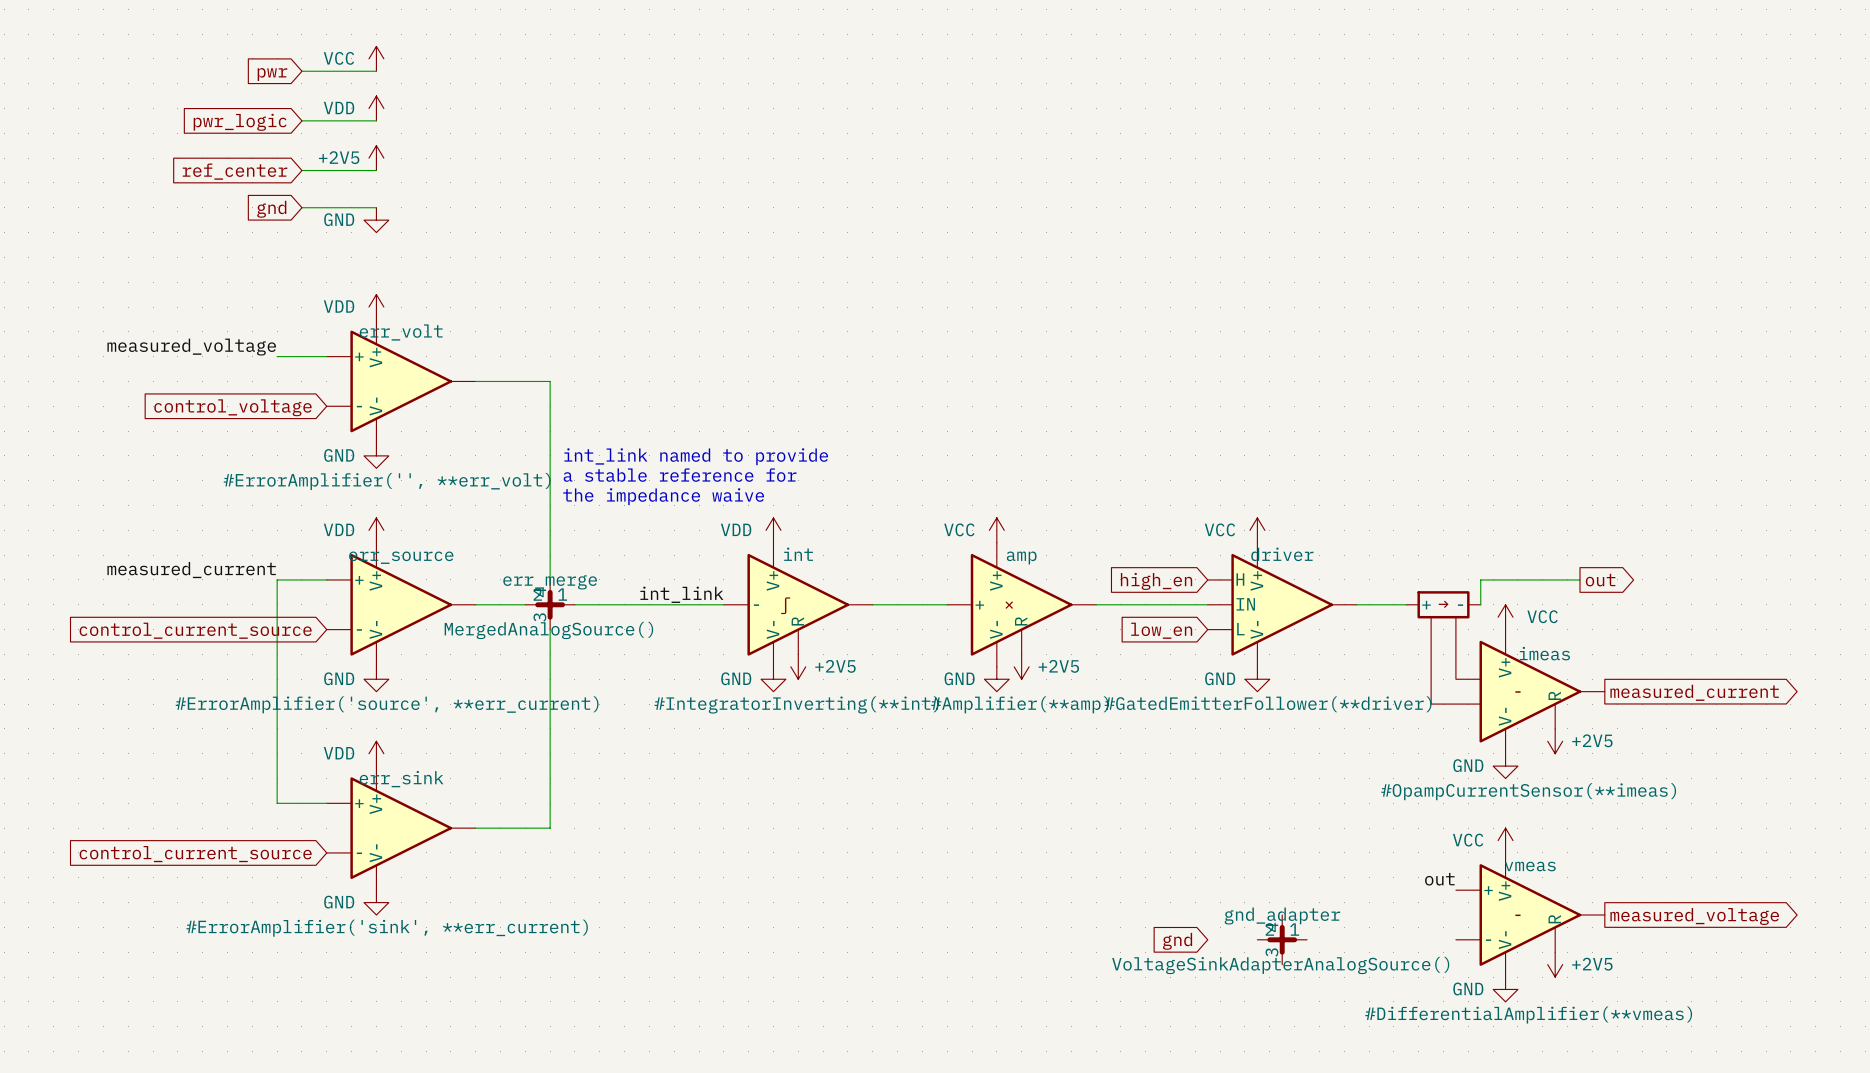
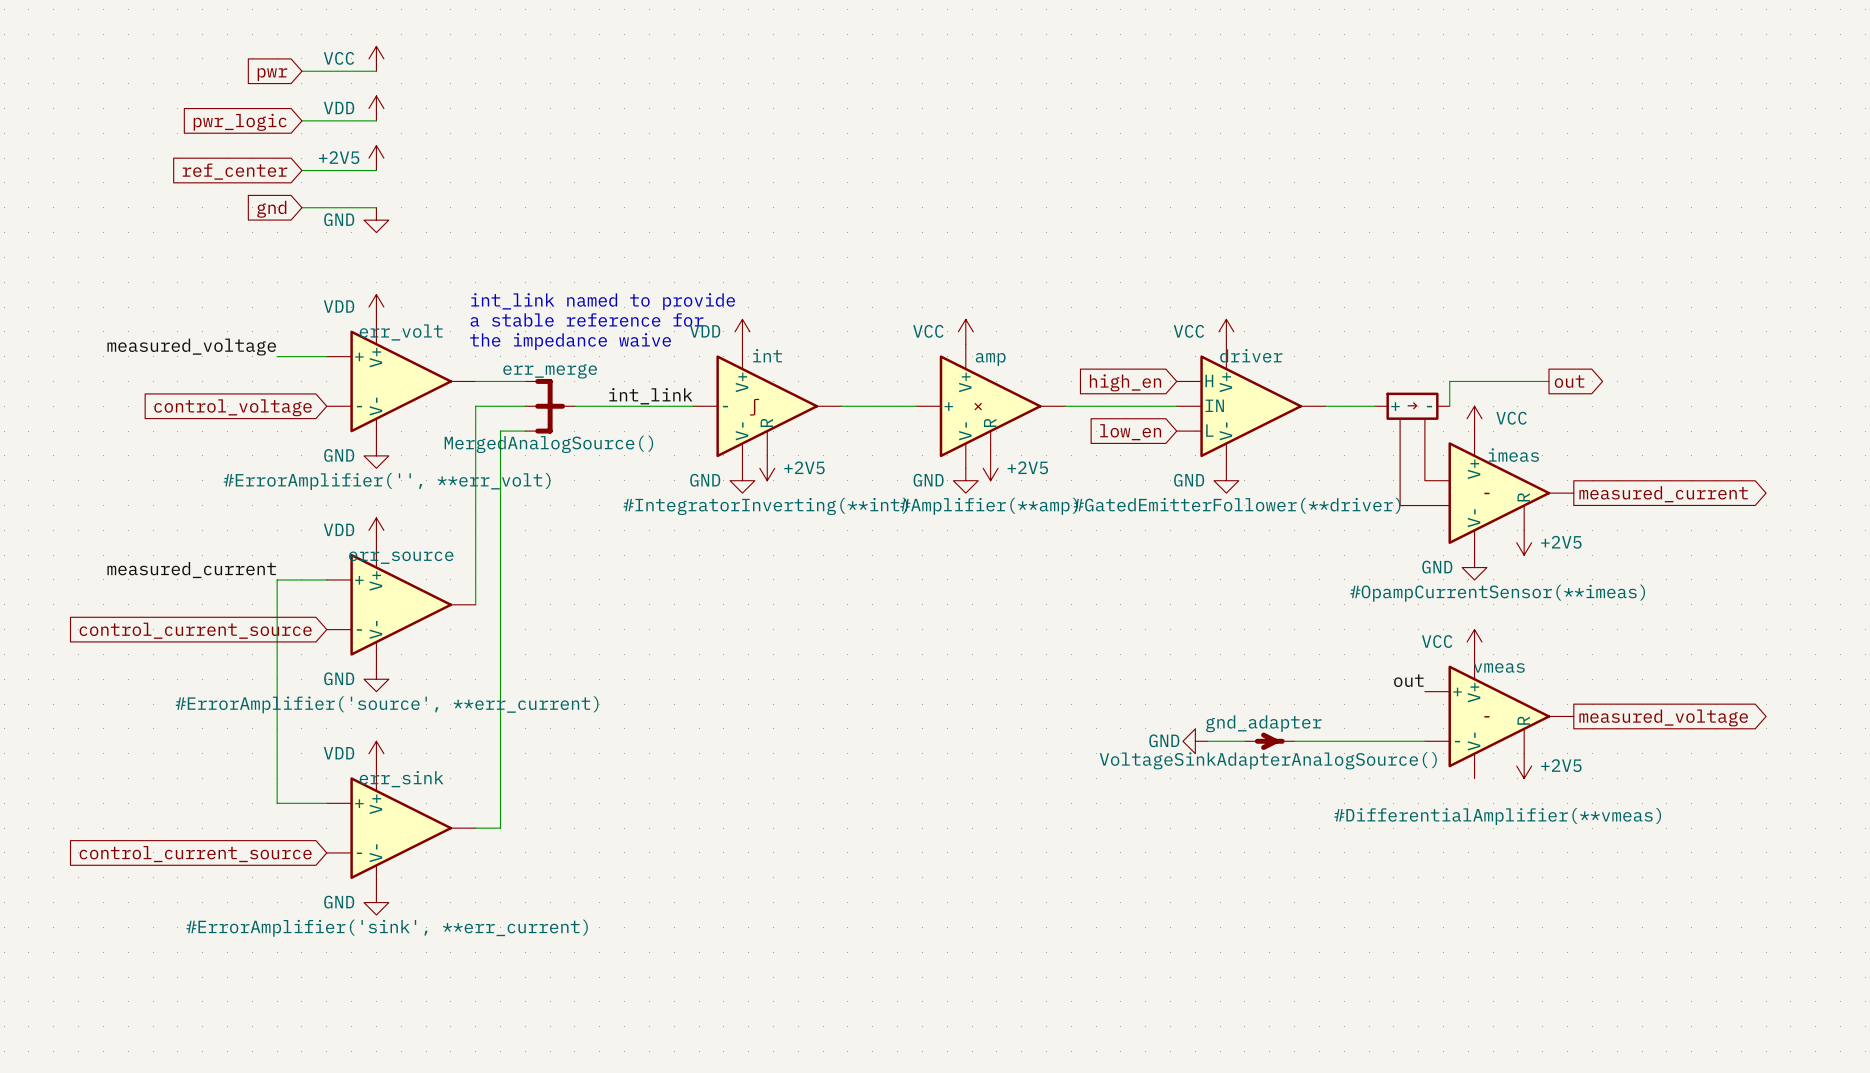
power symbol: none -> VCC (965, 331)
power symbol: none -> VCC (1226, 331)
wire: (525, 381) (550, 381) (550, 579) -> none
err_merge: none -> MergedAnalogSource() (550, 406)
wire: none -> (574, 406) (692, 406)
power symbol: none -> VCC (1474, 418)
text position: int_link named to provide (696, 456) -> int_link named to provide (603, 301)
power symbol: none -> +2V5 (767, 468)
power symbol: none -> +2V5 (990, 468)
text position: a stable reference for (680, 475) -> a stable reference for (587, 320)
power symbol: none -> GND (742, 480)
power symbol: none -> GND (965, 480)
power symbol: none -> GND (1226, 480)
text position: the impedance waive (663, 496) -> the impedance waive (570, 341)
power symbol position: VDD (773, 530) -> VDD (742, 331)
power symbol: VCC (996, 530) -> none
power symbol: VCC (1257, 530) -> none
power symbol: none -> +2V5 (1524, 542)
power symbol: none -> GND (1474, 567)
wire: (1580, 579) (1480, 579) (1480, 604) -> (1548, 381) (1449, 381) (1449, 406)
global label position: out (1600, 580) -> out (1569, 381)
global label position: high_en (1156, 581) -> high_en (1125, 382)
label position: int_link (681, 594) -> int_link (650, 396)
wire: (475, 604) (525, 604) -> (475, 604) (475, 406) (525, 406)
err_merge: MergedAnalogSource() (550, 604) -> none
wire: (574, 604) (723, 604) -> none
int position: (798, 604) -> (767, 406)
wire: (872, 604) (947, 604) -> (841, 406) (916, 406)
amp position: (1021, 604) -> (990, 406)
wire: (1096, 604) (1207, 604) -> (1065, 406) (1176, 406)
driver position: (1282, 604) -> (1251, 406)
wire: (1356, 604) (1406, 604) -> (1325, 406) (1375, 406)
power symbol text position: VCC (1542, 616) -> VCC (1437, 641)
power symbol position: VCC (1505, 617) -> VCC (1474, 642)
wire: (550, 629) (550, 828) (500, 828) -> (525, 431) (500, 431) (500, 828)
global label position: low_en (1161, 630) -> low_en (1130, 432)
power symbol: +2V5 (798, 666) -> none
power symbol: +2V5 (1021, 666) -> none
imeas position: (1505, 672) -> (1474, 473)
power symbol: GND (773, 679) -> none
power symbol: GND (996, 679) -> none
power symbol rotation: 0° (1257, 679) -> 90° clockwise (1195, 741)
power symbol position: GND (1257, 679) -> GND (1195, 741)
global label position: measured_current (1694, 692) -> measured_current (1663, 494)
wire: none -> (1207, 741) (1244, 741)
gnd_adapter: none -> VoltageSinkAdapterAnalogSource() (1269, 741)
wire: none -> (1294, 741) (1424, 741)
power symbol position: +2V5 (1555, 741) -> +2V5 (1524, 766)
power symbol: GND (1505, 766) -> none
power symbol: VCC (1505, 840) -> none
label position: out (1439, 879) -> out (1408, 680)
vmeas position: (1530, 915) -> (1499, 716)
global label position: measured_voltage (1694, 916) -> measured_voltage (1663, 717)
gnd_adapter: VoltageSinkAdapterAnalogSource() (1282, 939) -> none
global label: gnd (1177, 941) -> none
power symbol: +2V5 (1555, 964) -> none
power symbol: GND (1505, 989) -> none

